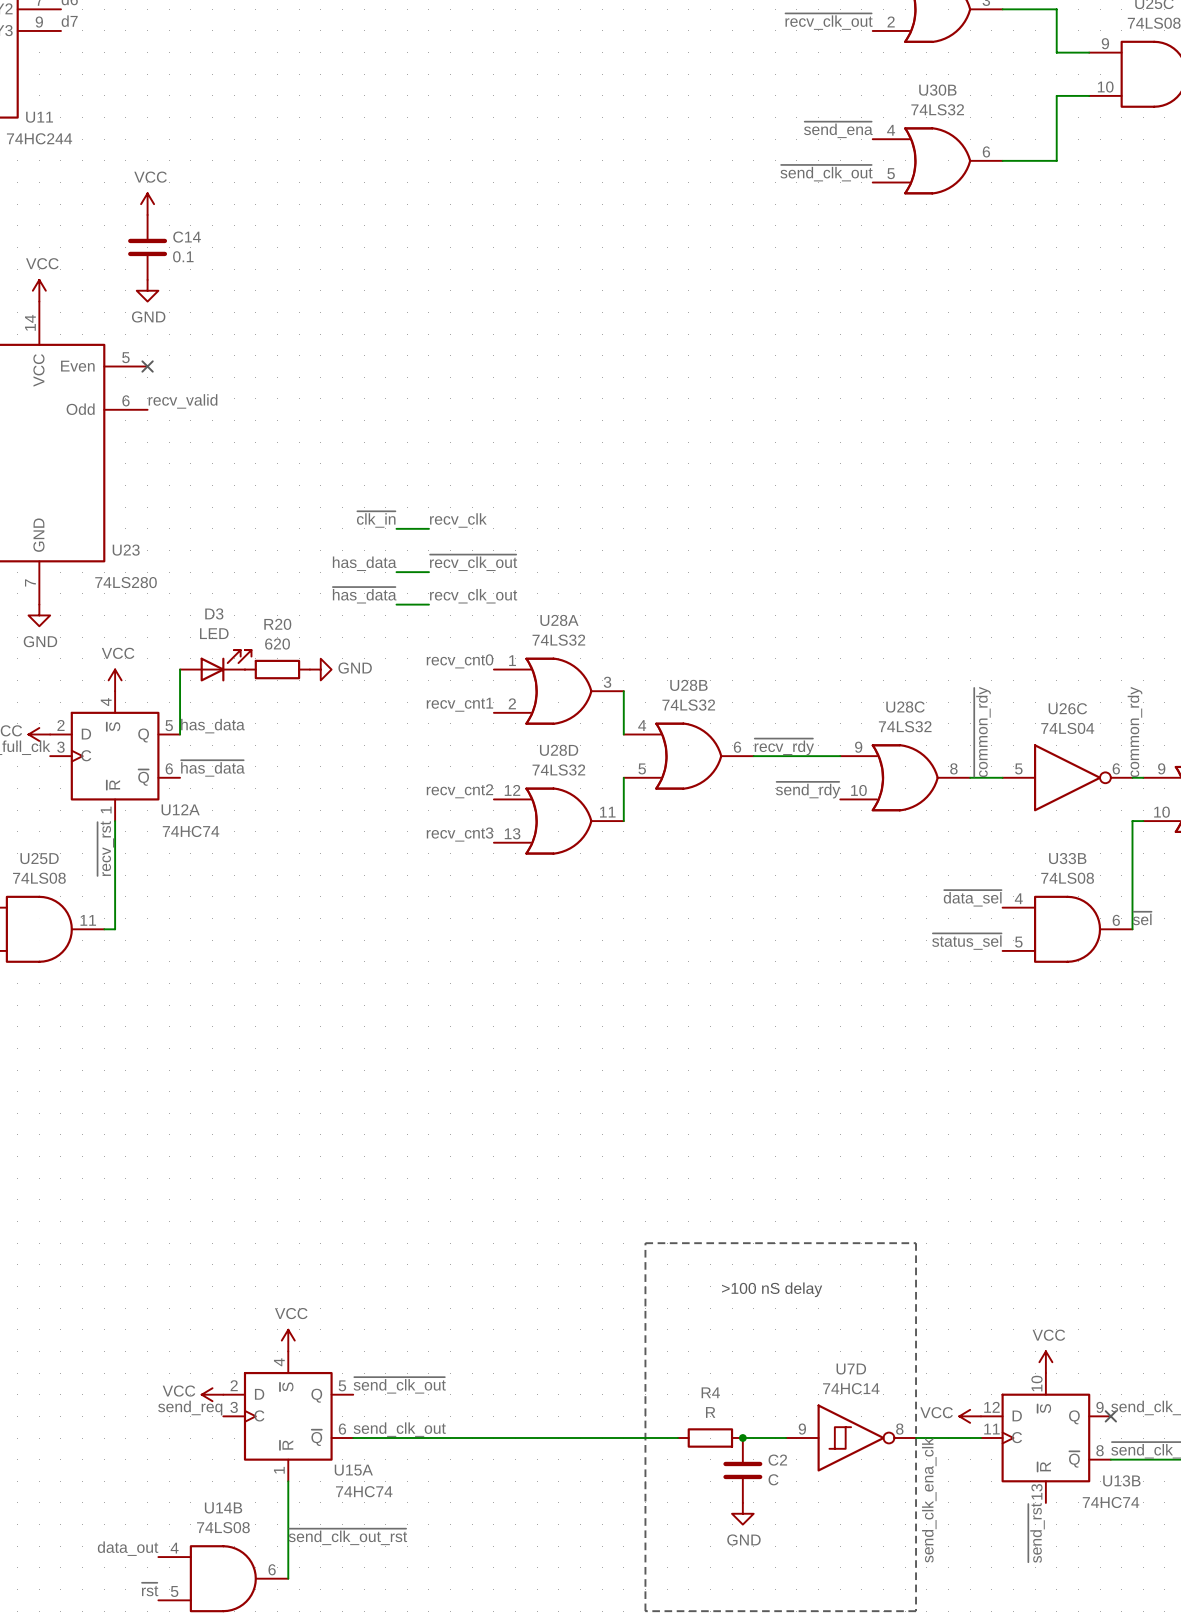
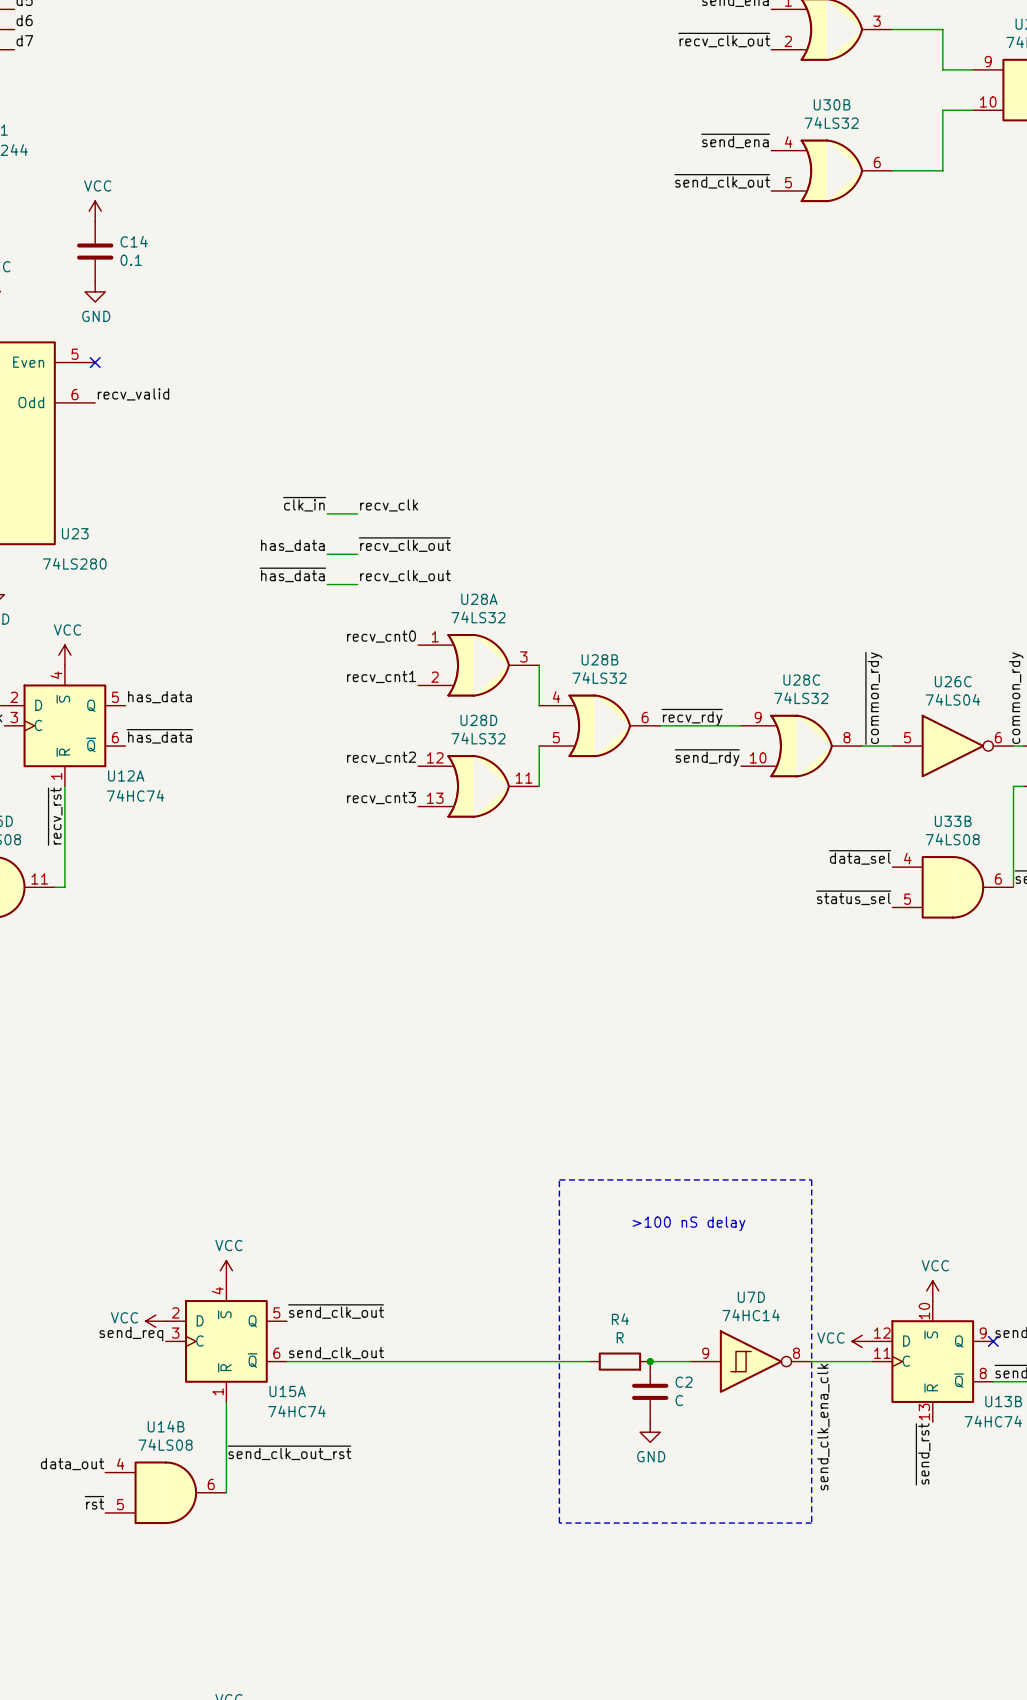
D3: LED (215, 665) -> none
wire: (180, 669) (180, 734) -> none
R20: 620 (277, 669) -> none
power symbol: GND (320, 669) -> none

